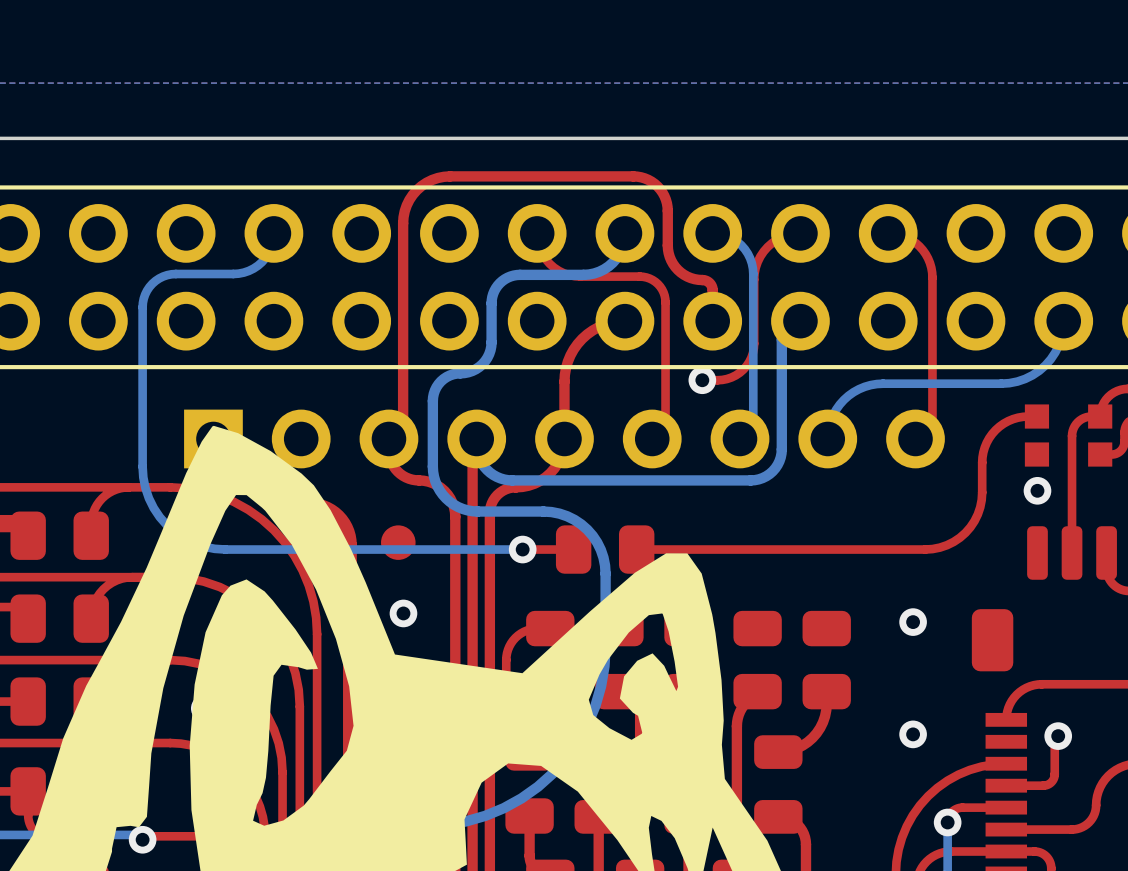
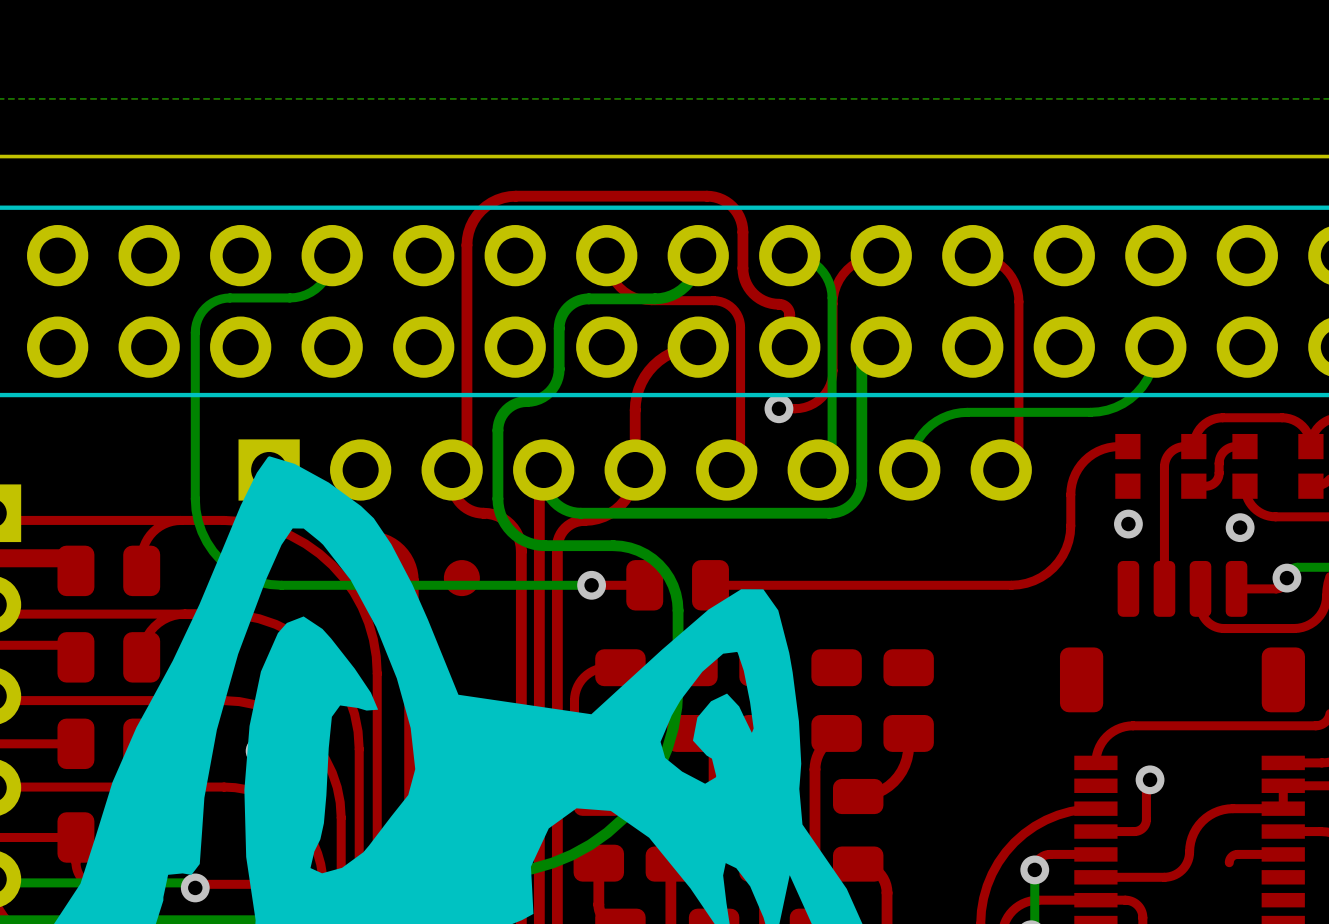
via: (403, 613) -> none
via: (913, 622) -> none
via: (913, 734) -> none

